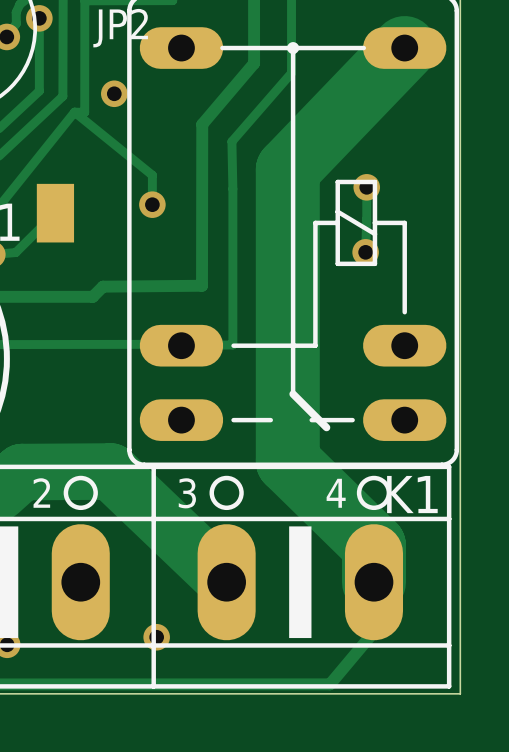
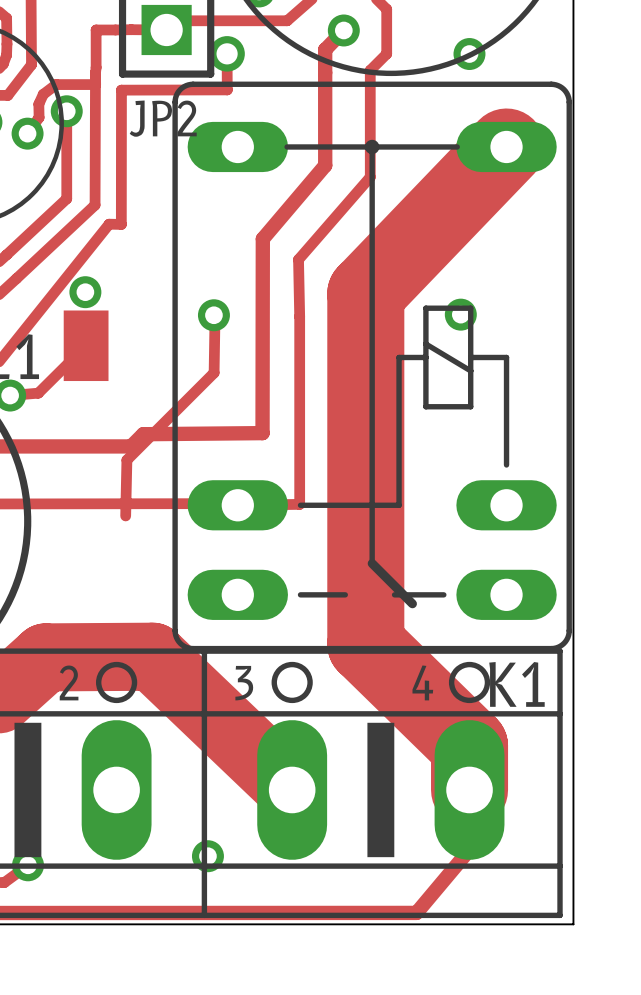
via: (114, 93) -> none
track: (74, 112) (152, 175) (152, 204) -> none
via: none -> (85, 292)
track: none -> (213, 315) (214, 372) (126, 460) (125, 515)
track: (366, 187) (365, 252) -> none
via position: (152, 204) -> (213, 315)
via: (365, 252) -> none

